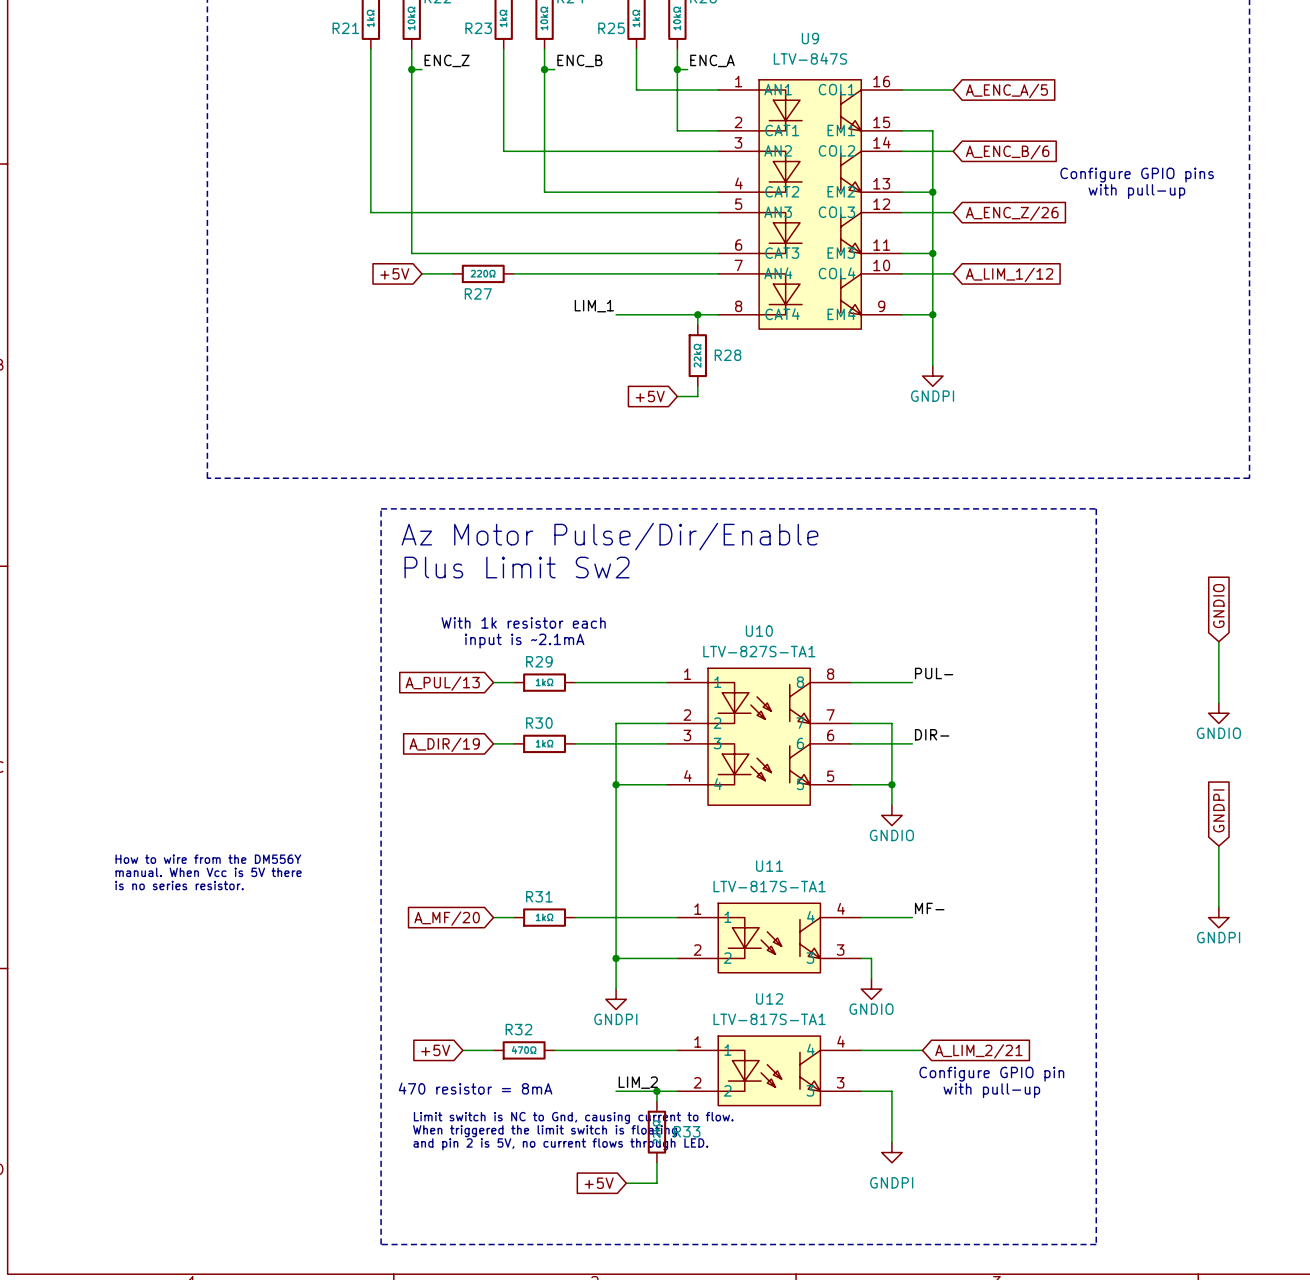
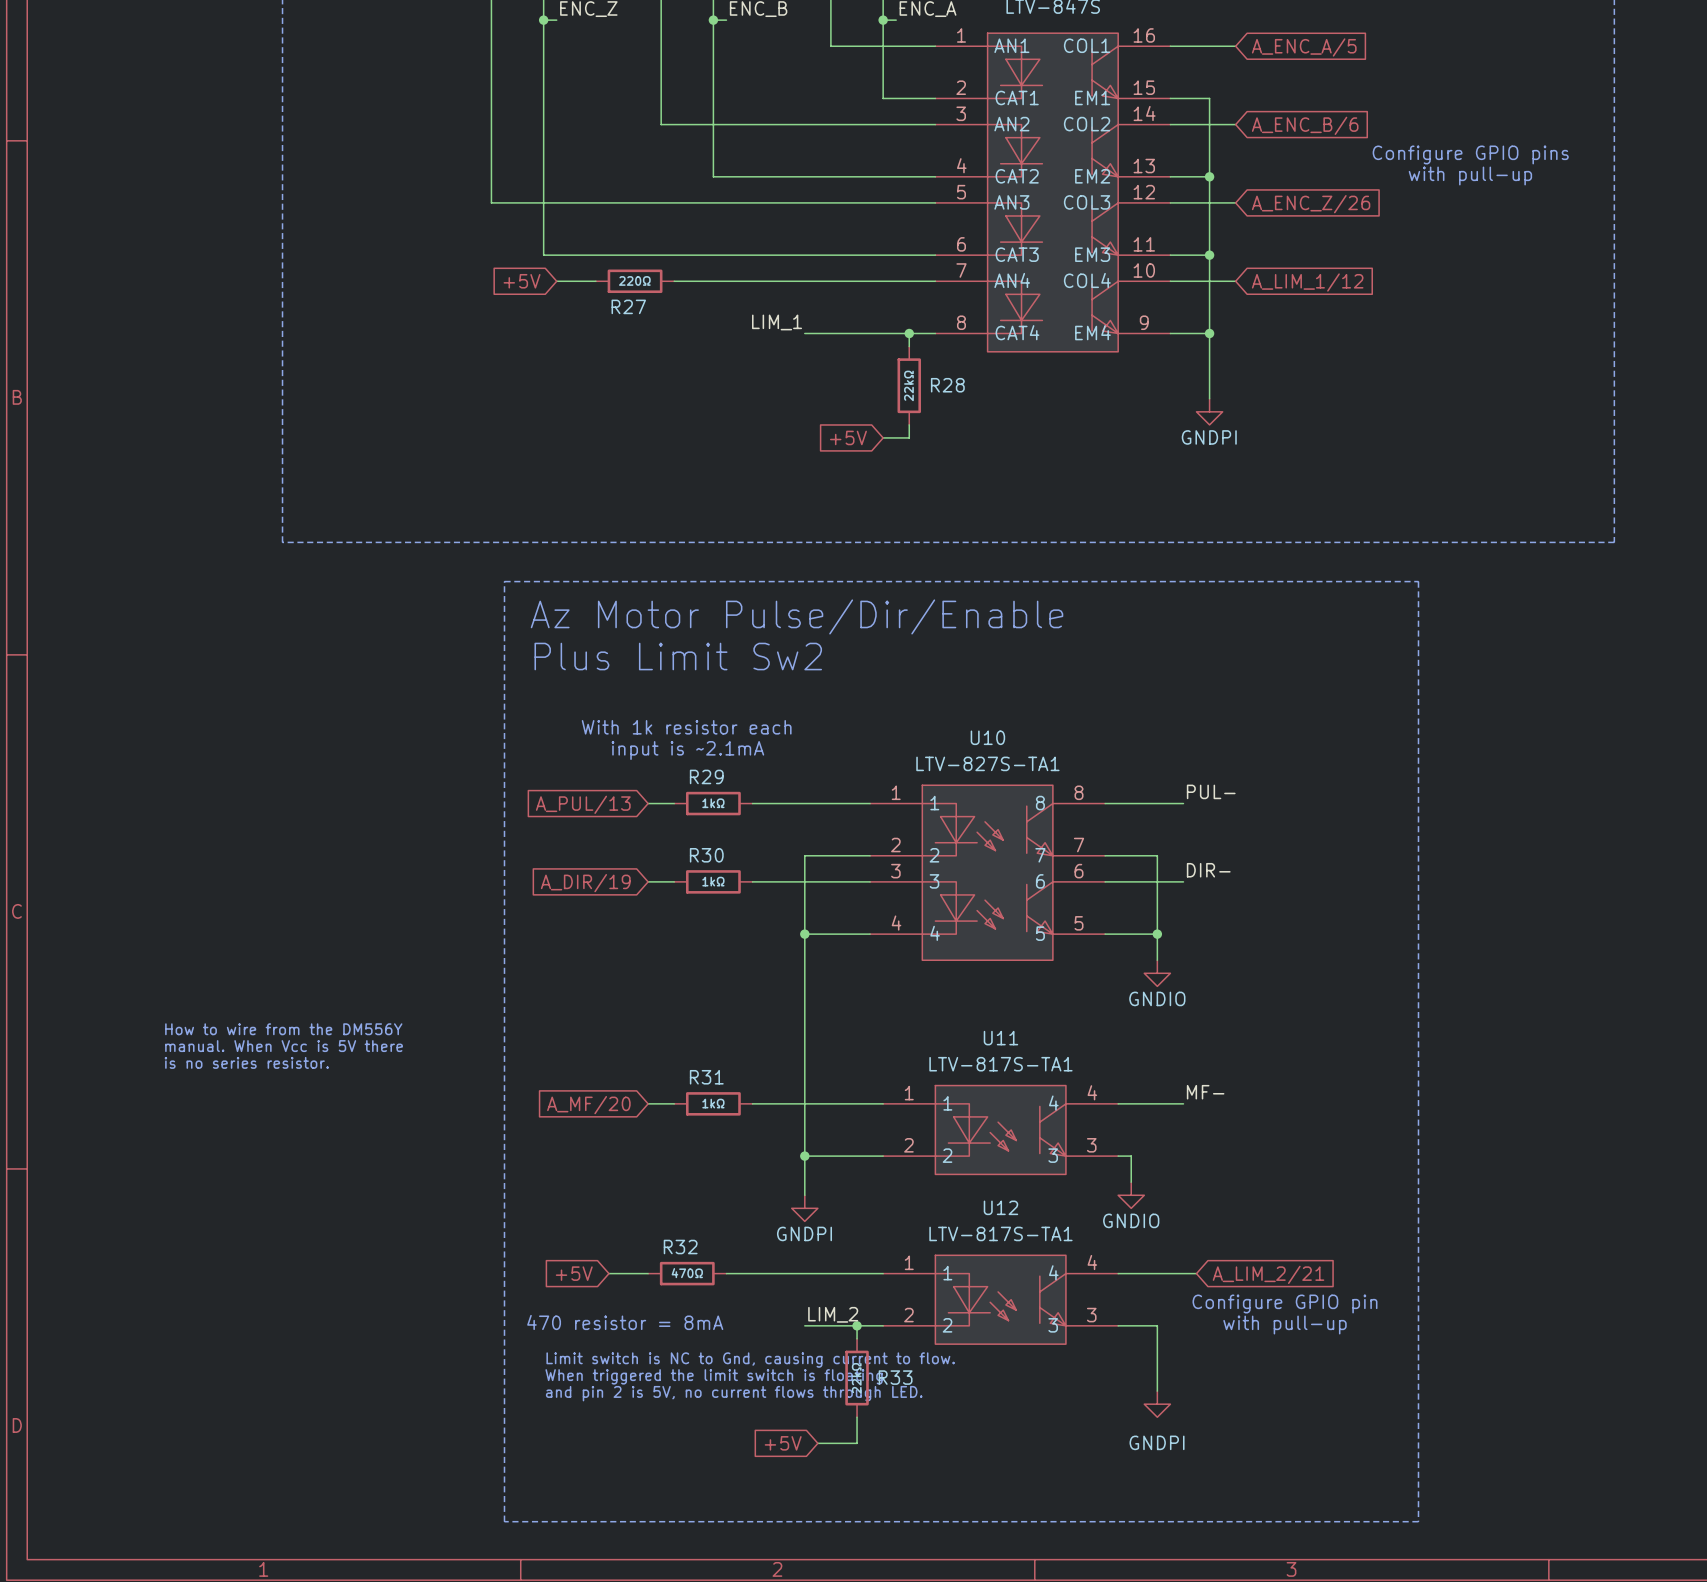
global label: GNDIO (1218, 606) -> none
wire: (1218, 641) (1218, 703) -> none
power symbol: GNDIO (1218, 713) -> none
global label: GNDPI (1218, 810) -> none
wire: (1218, 846) (1218, 907) -> none
power symbol: GNDPI (1218, 917) -> none

